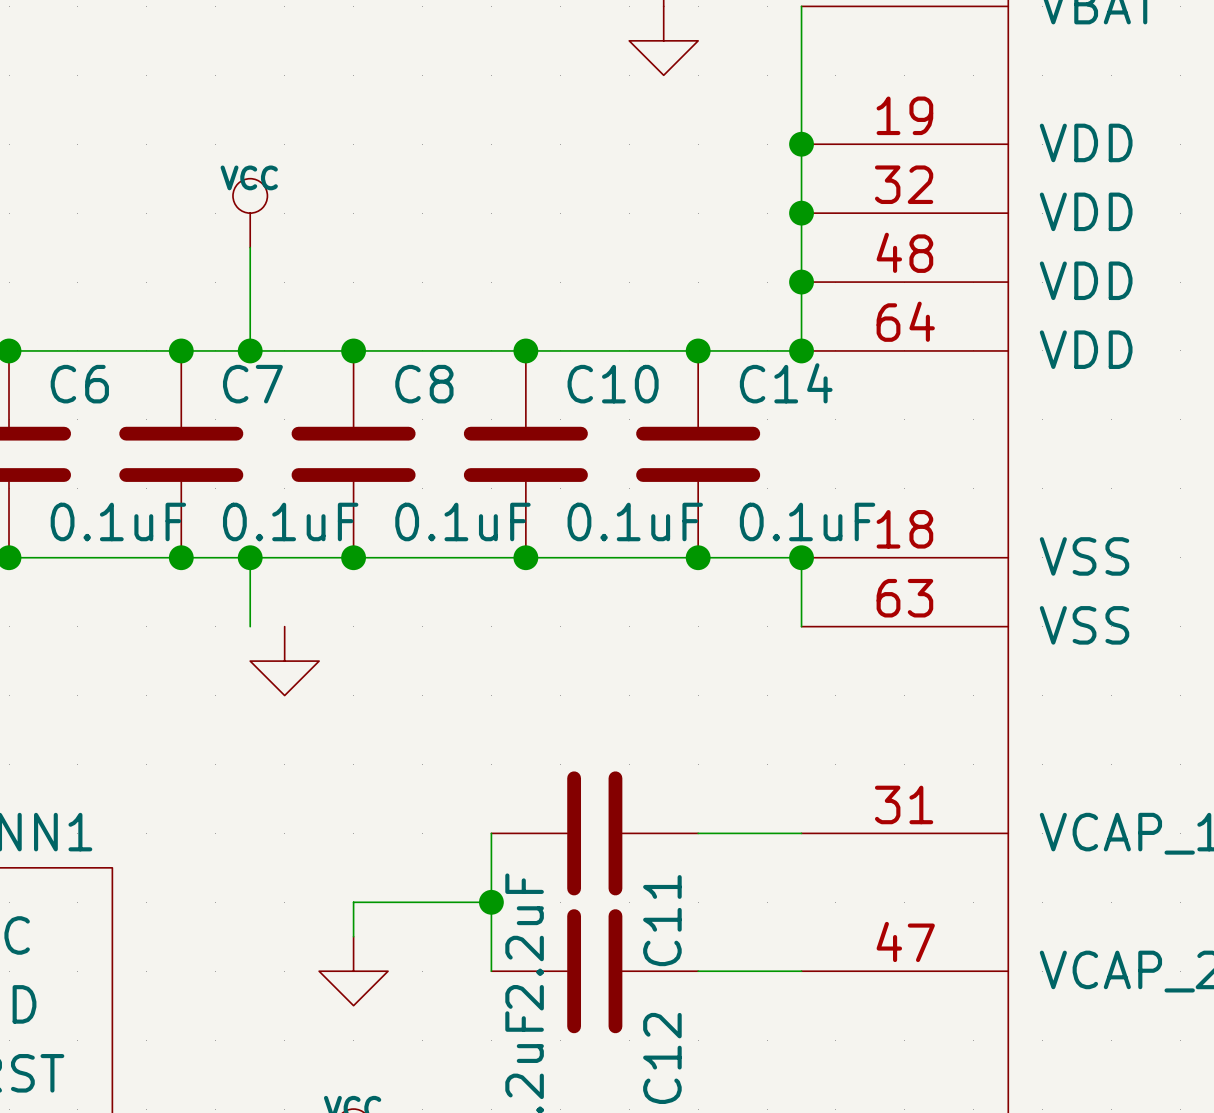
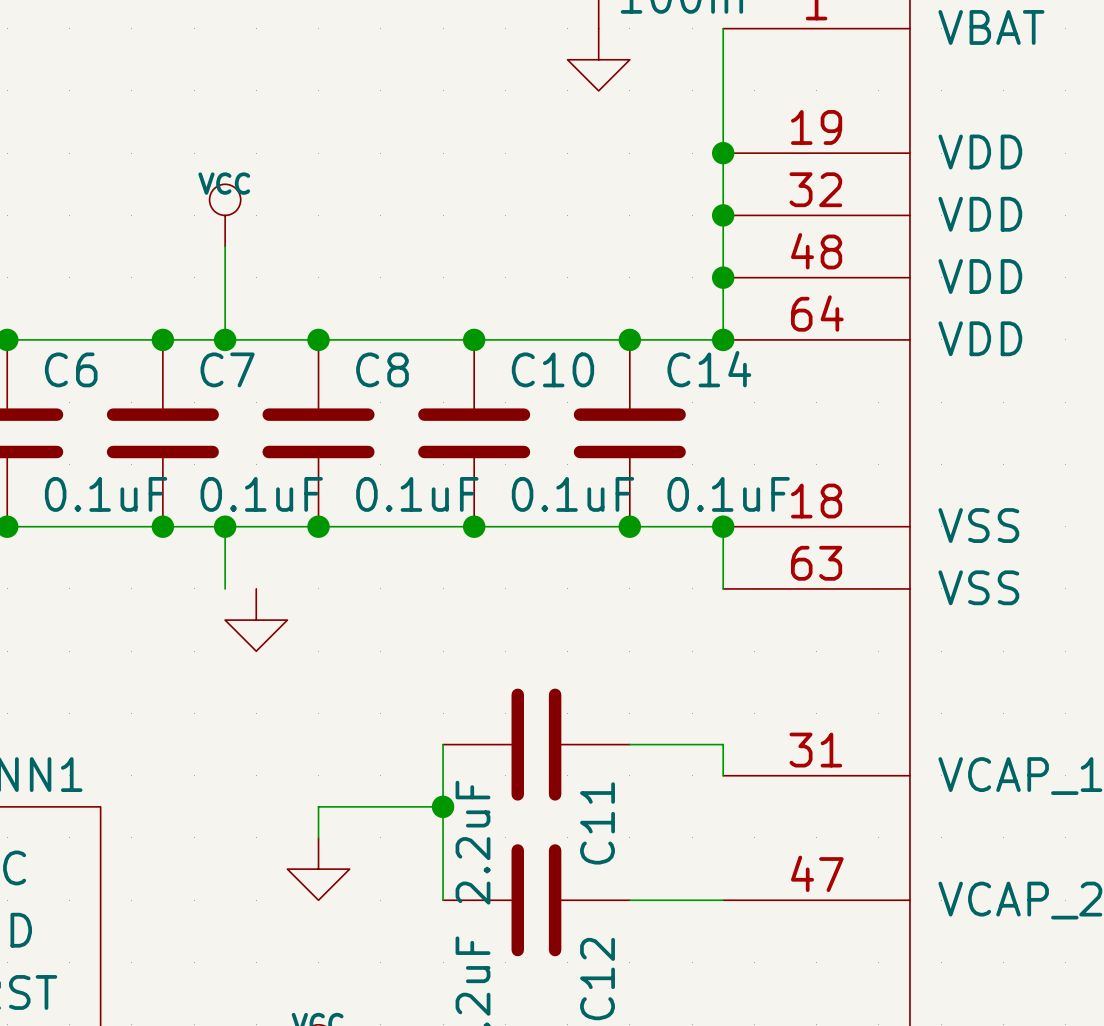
wire: none -> (443, 744) (443, 775)
C11 position: (594, 833) -> (536, 744)
wire: (698, 833) (801, 833) -> (629, 744) (723, 744) (723, 775)
wire: (491, 902) (353, 902) (353, 936) -> (443, 806) (318, 806) (318, 837)
junction position: (491, 902) -> (443, 806)
power symbol position: (353, 971) -> (318, 869)

